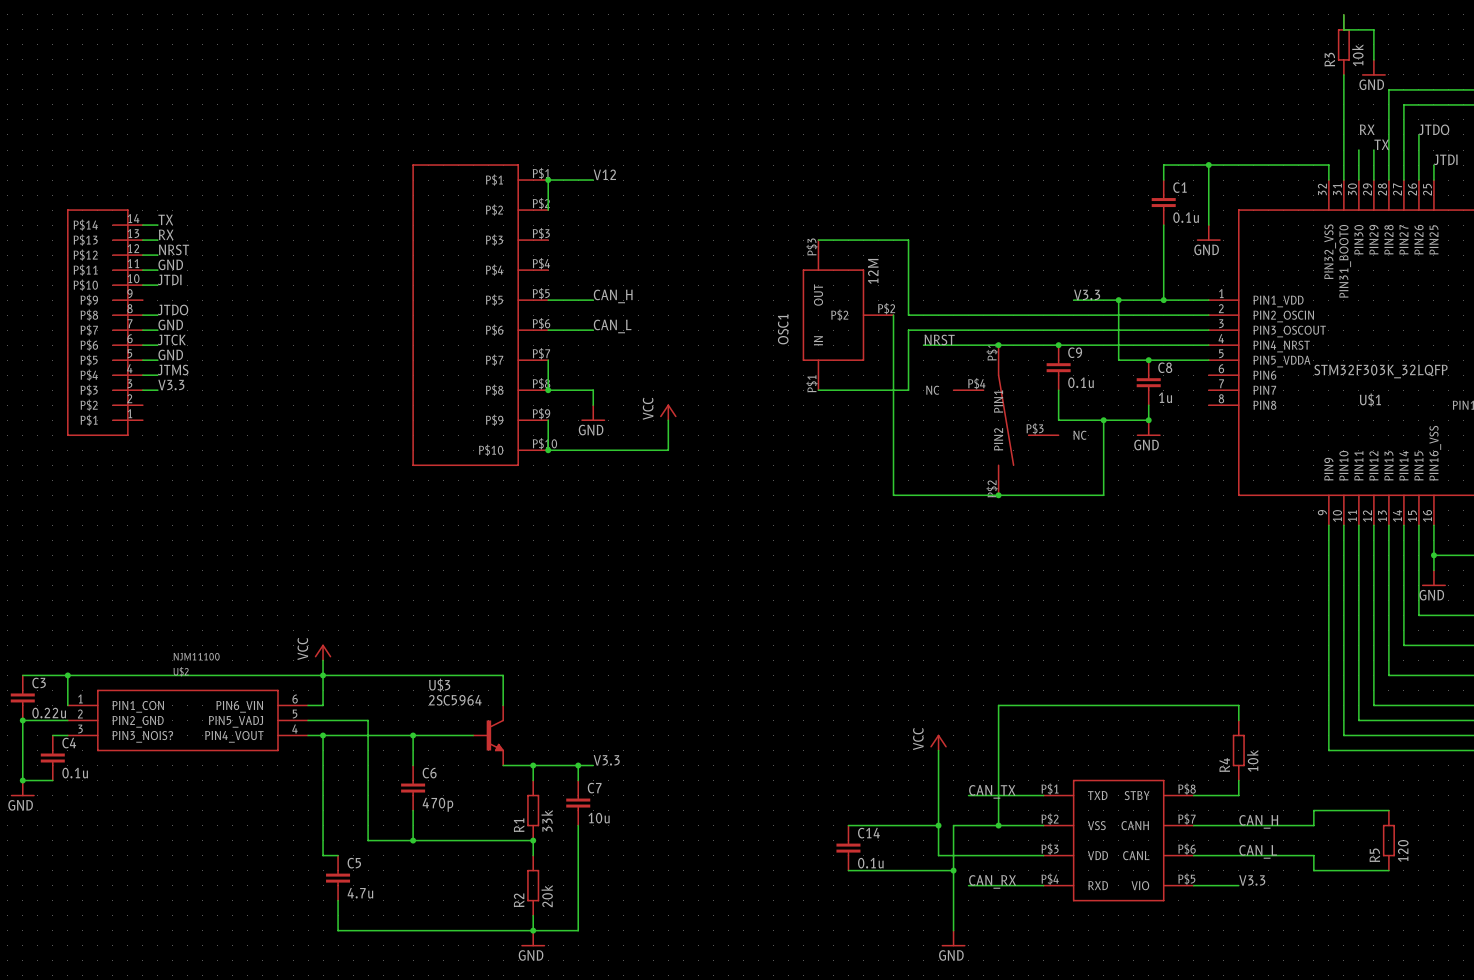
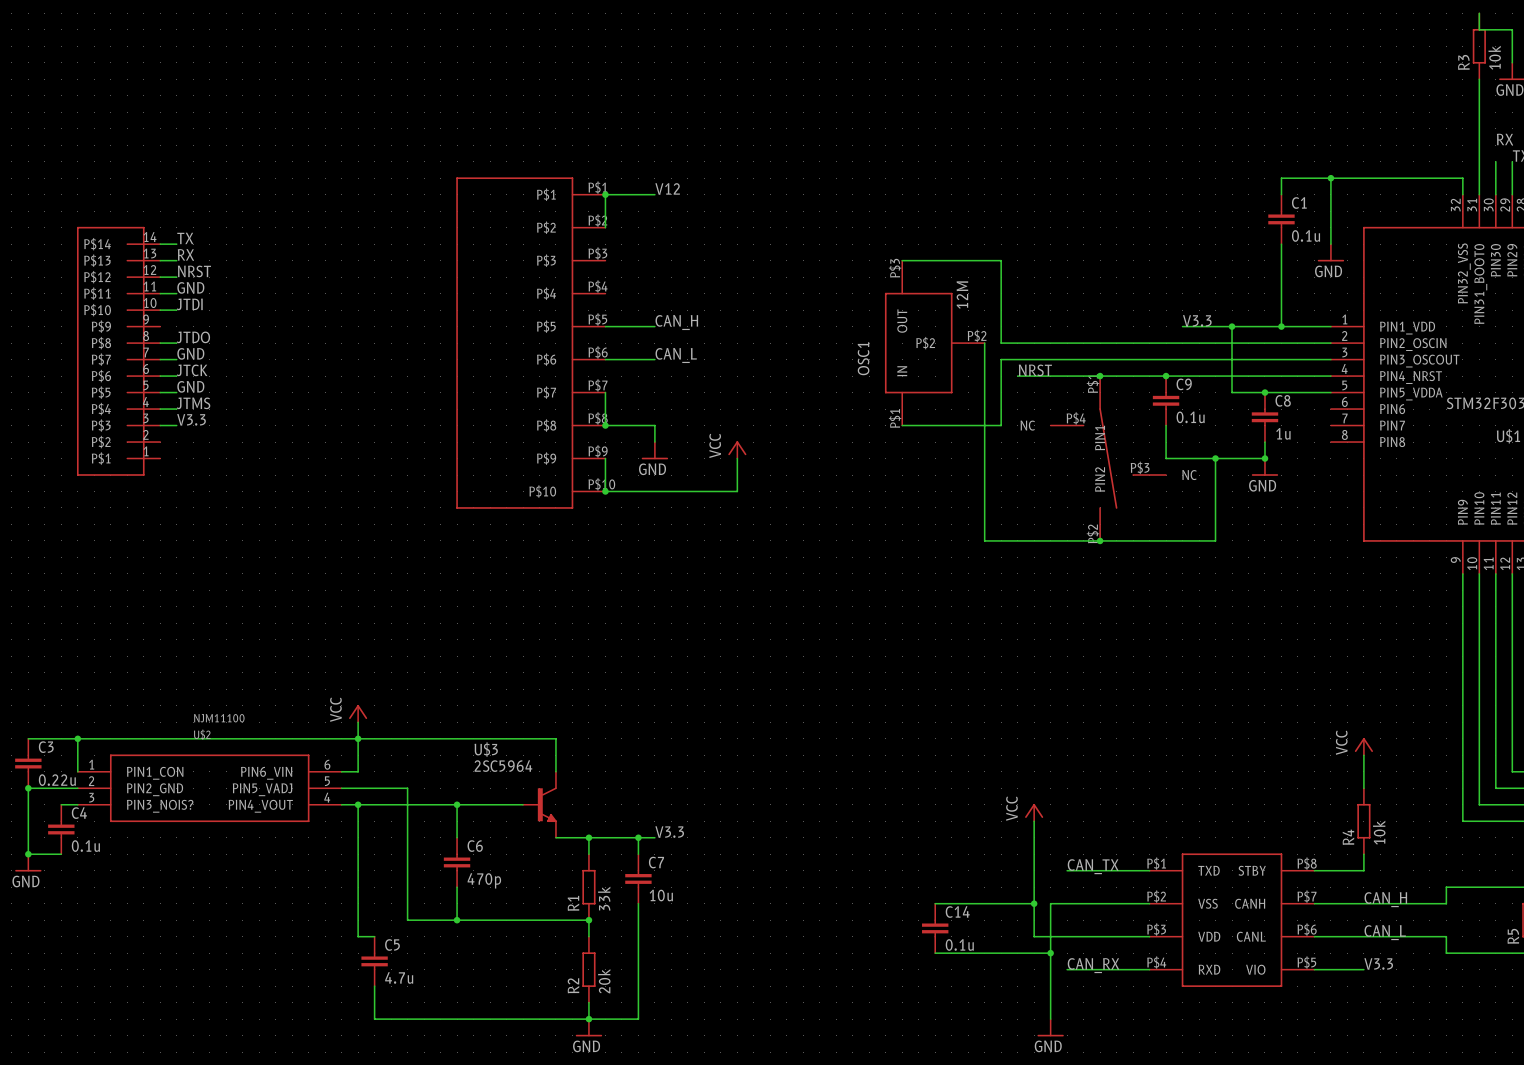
power symbol: none -> VCC (1363, 746)
wire: (1238, 705) (998, 705) (998, 825) -> (1363, 771) (1363, 755)
junction: (998, 825) -> none

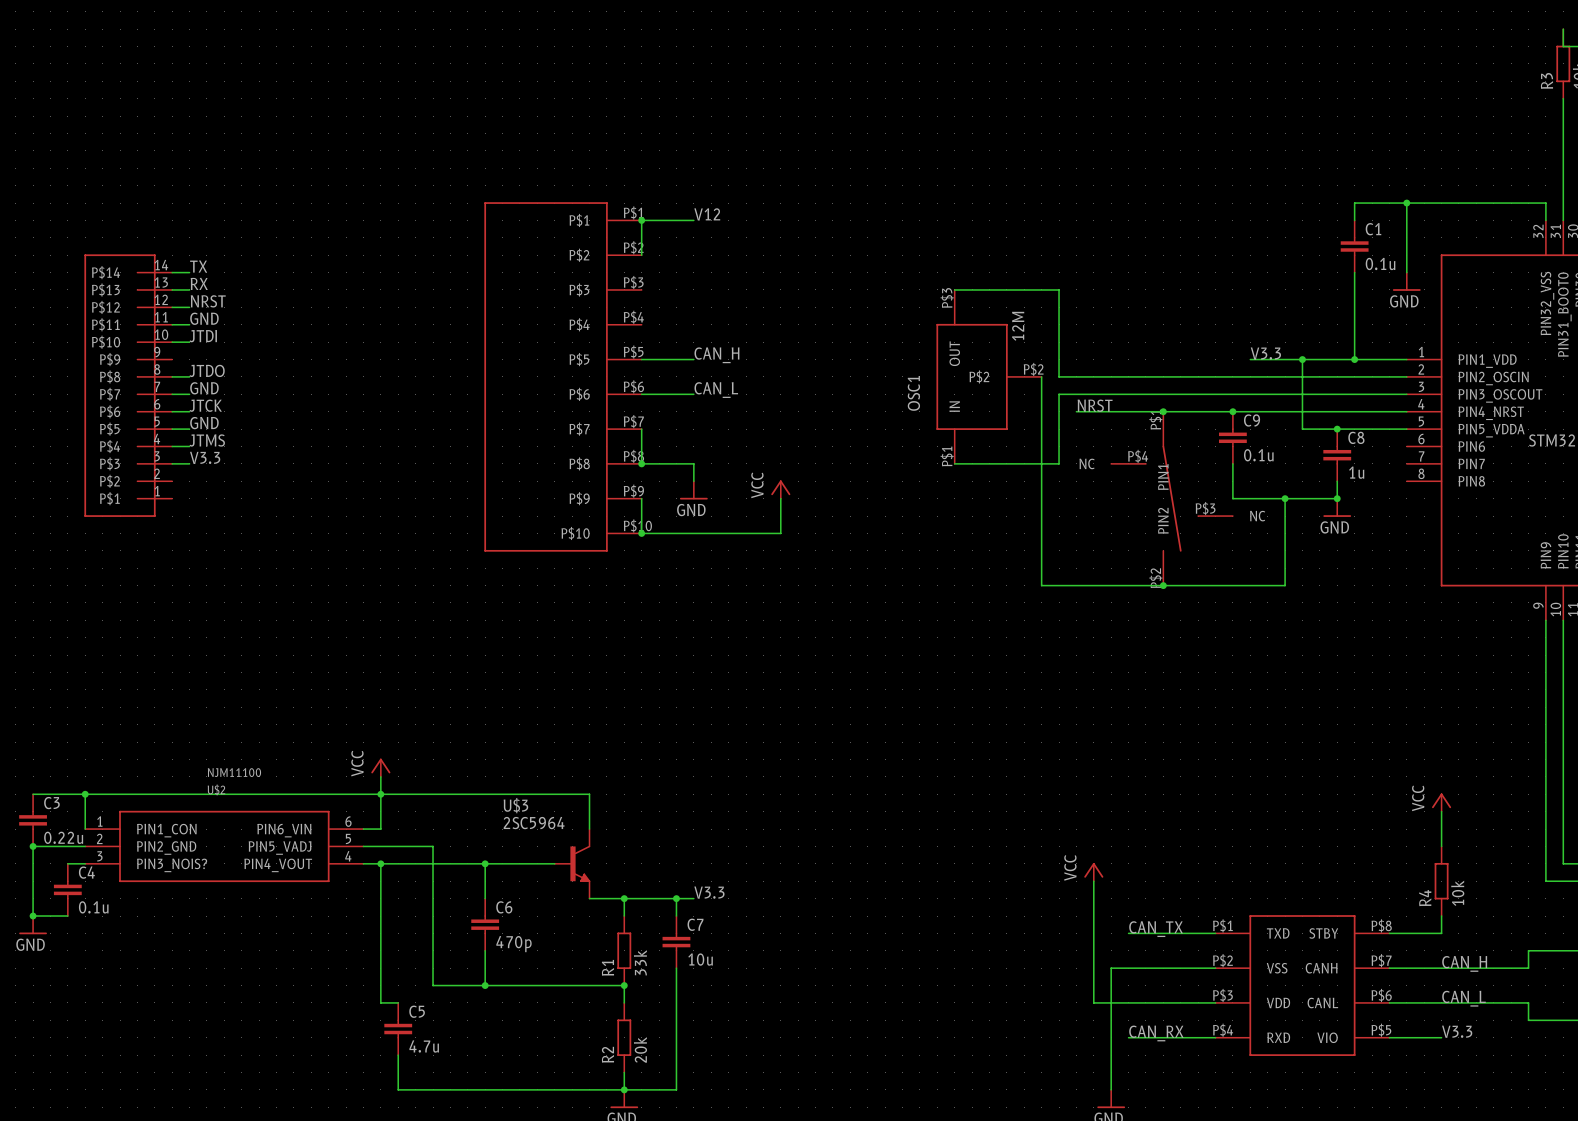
wire: (935, 903) (1034, 903) -> none
junction: (1034, 903) -> none
C14: 0.1u (935, 928) -> none
wire: (935, 953) (1050, 953) -> none
junction: (1050, 953) -> none

